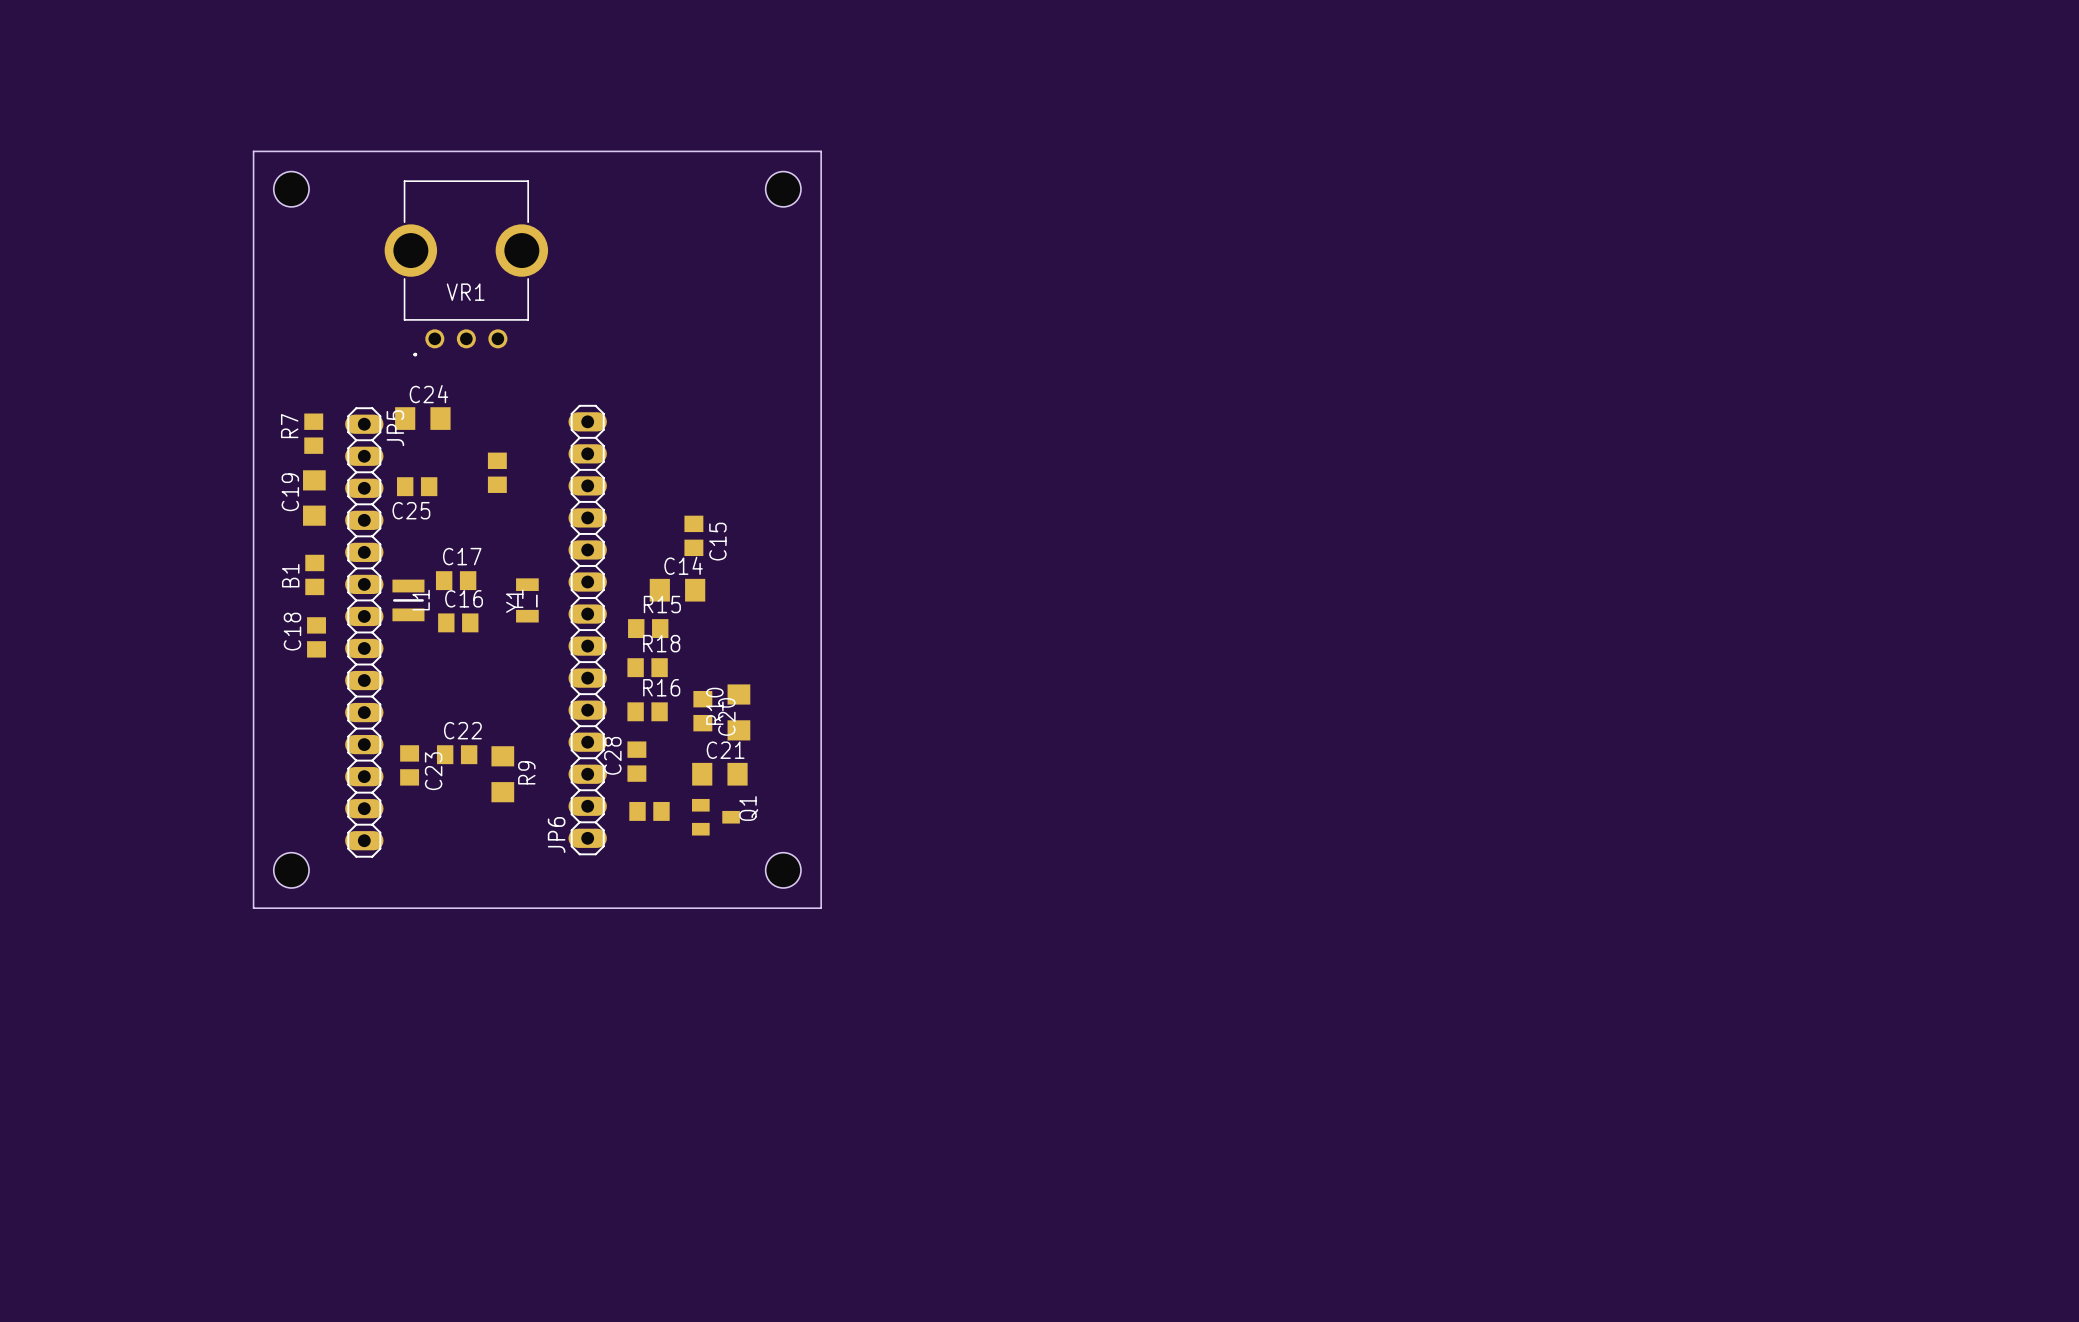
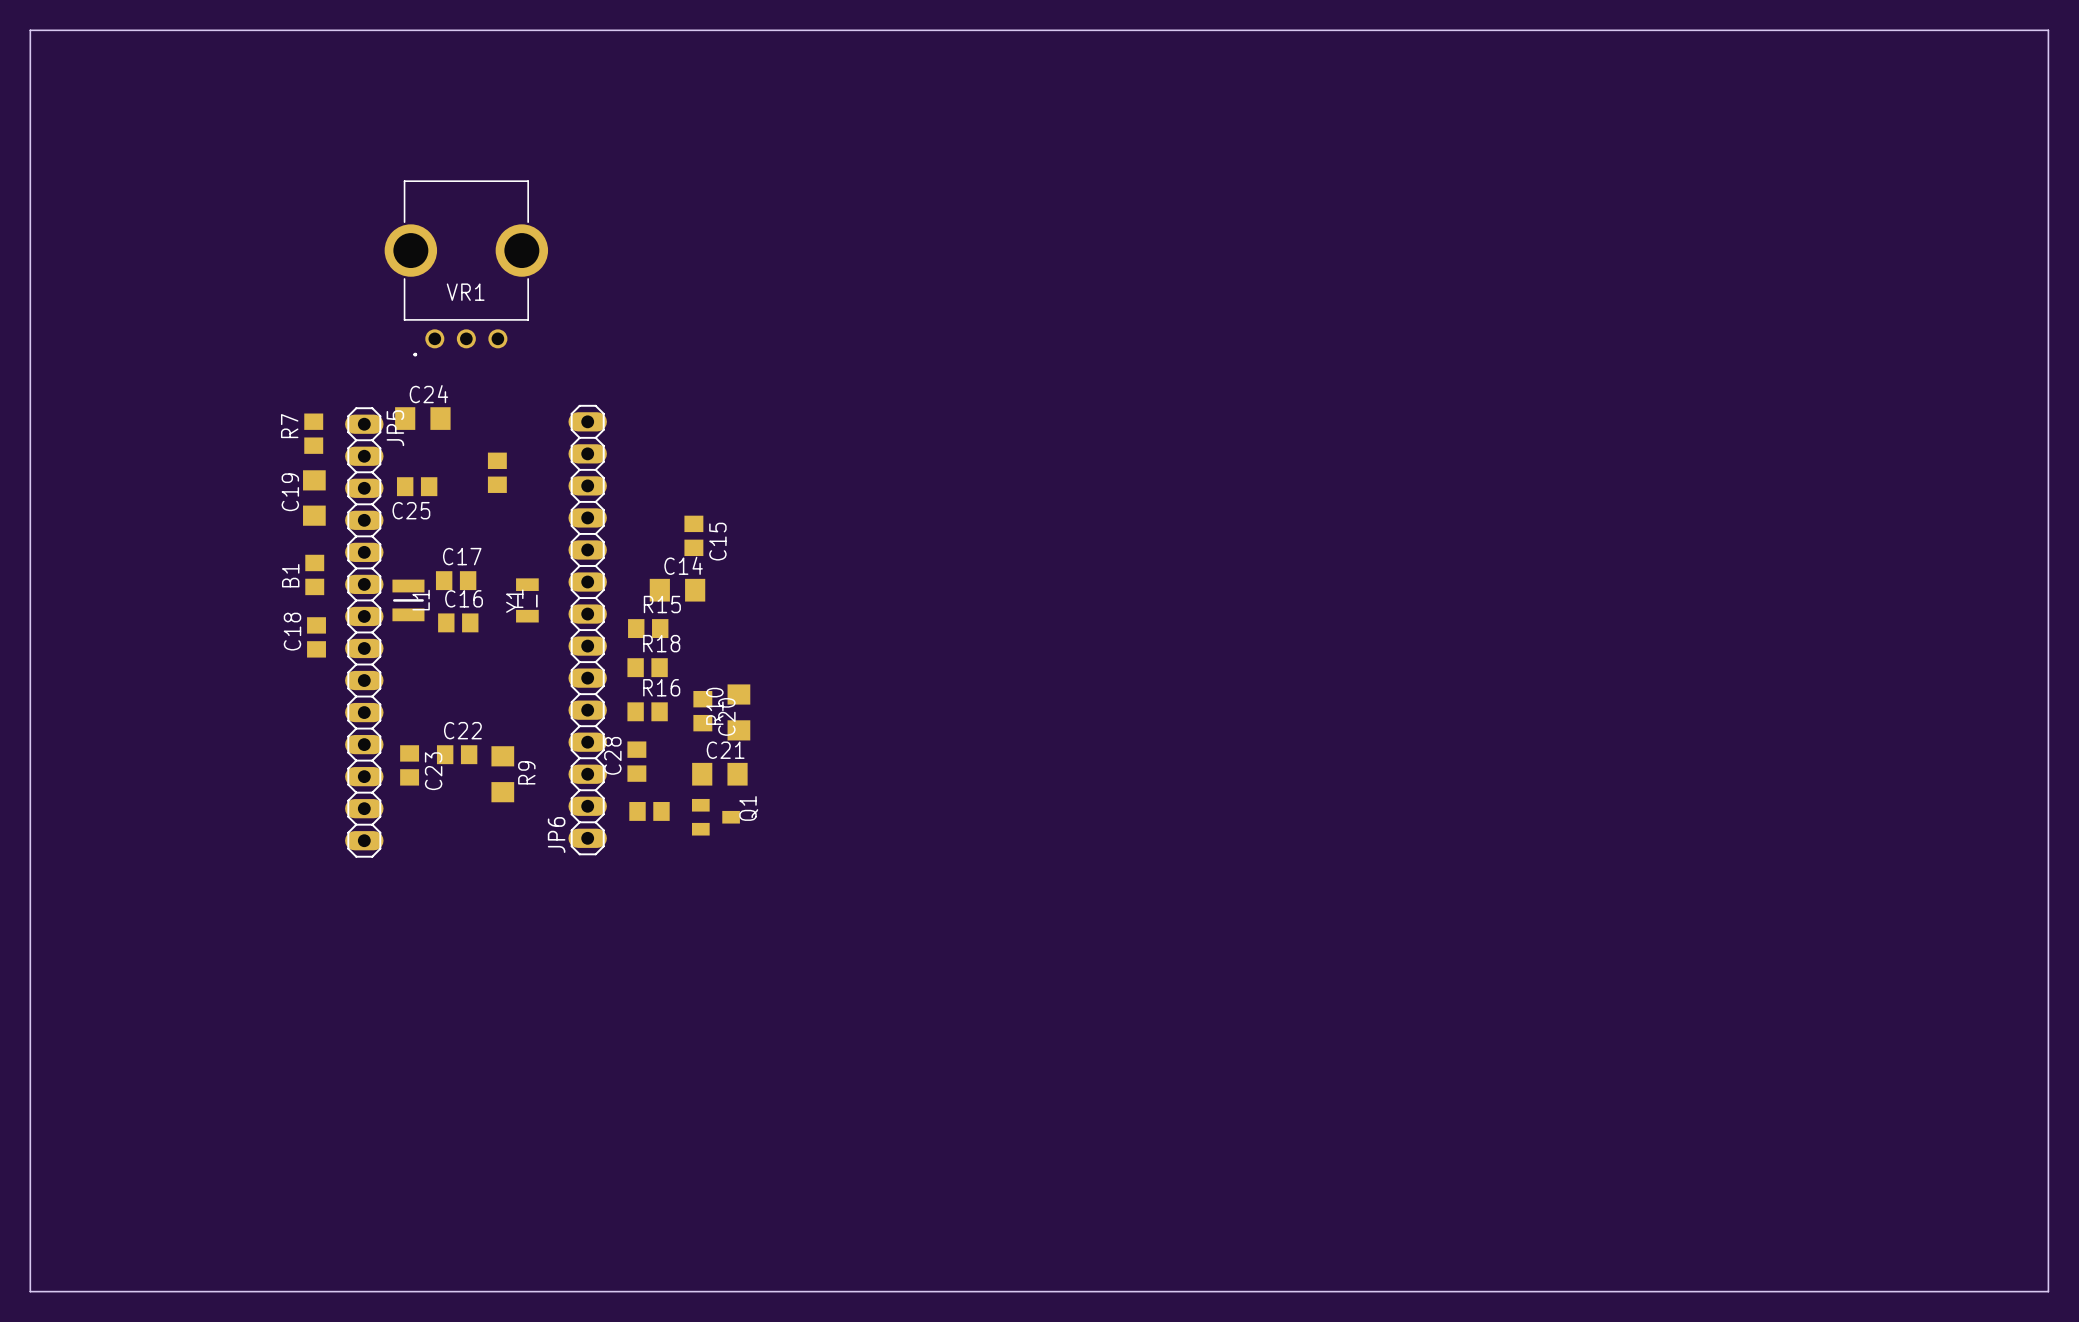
board edge: none -> (30, 30) (2048, 30) (2048, 1291) (30, 1291) (30, 30)
board edge: (253, 151) (821, 151) (821, 908) (253, 908) (253, 151) -> none
hole: (291, 189) -> none
hole: (783, 189) -> none
hole: (291, 870) -> none
hole: (783, 870) -> none

